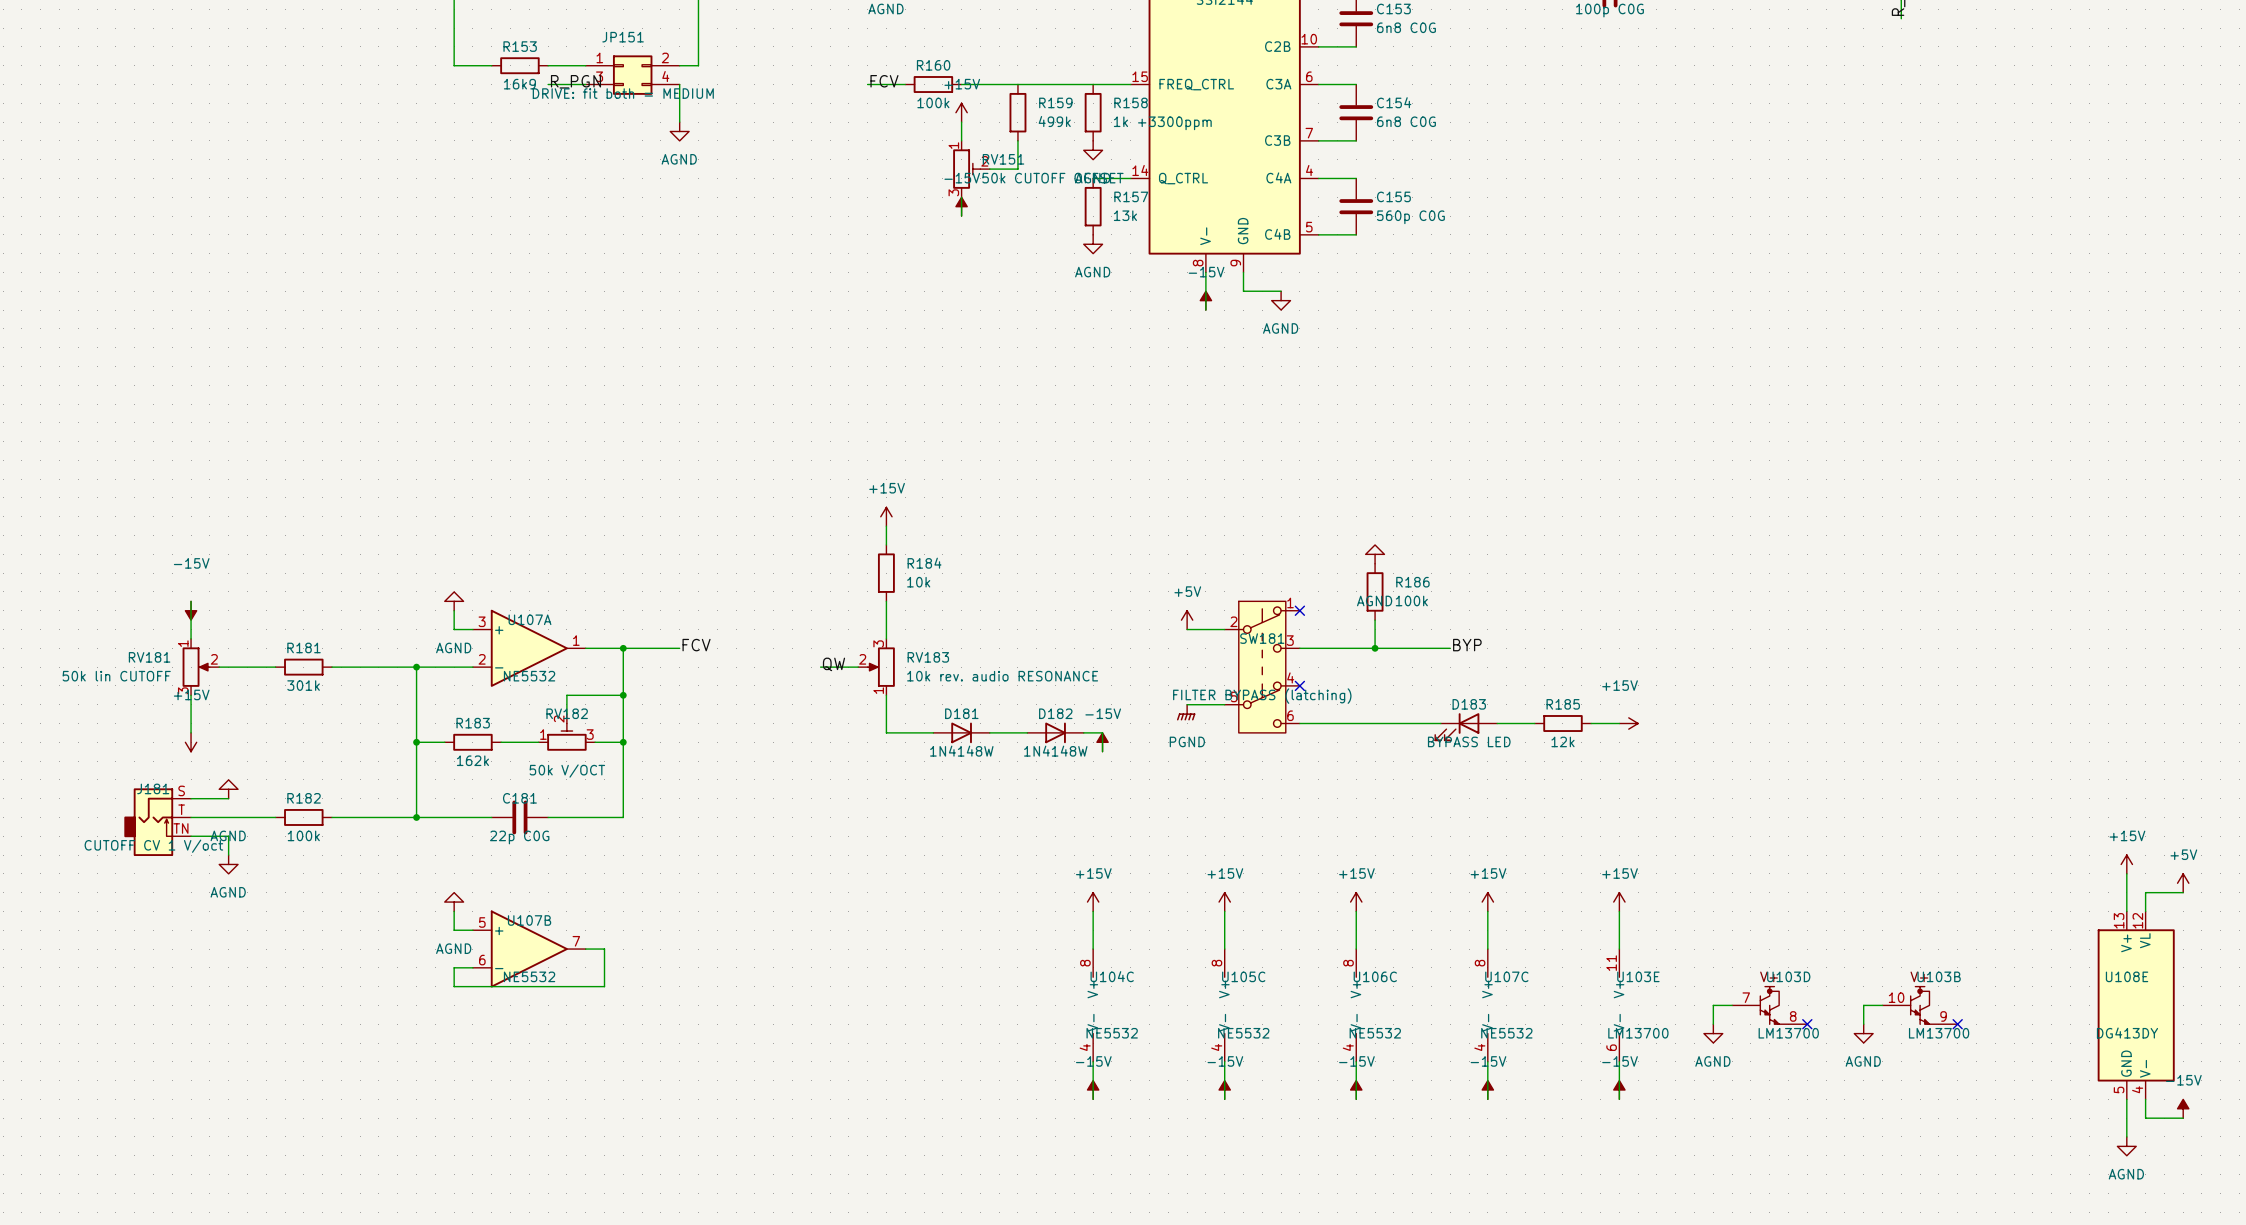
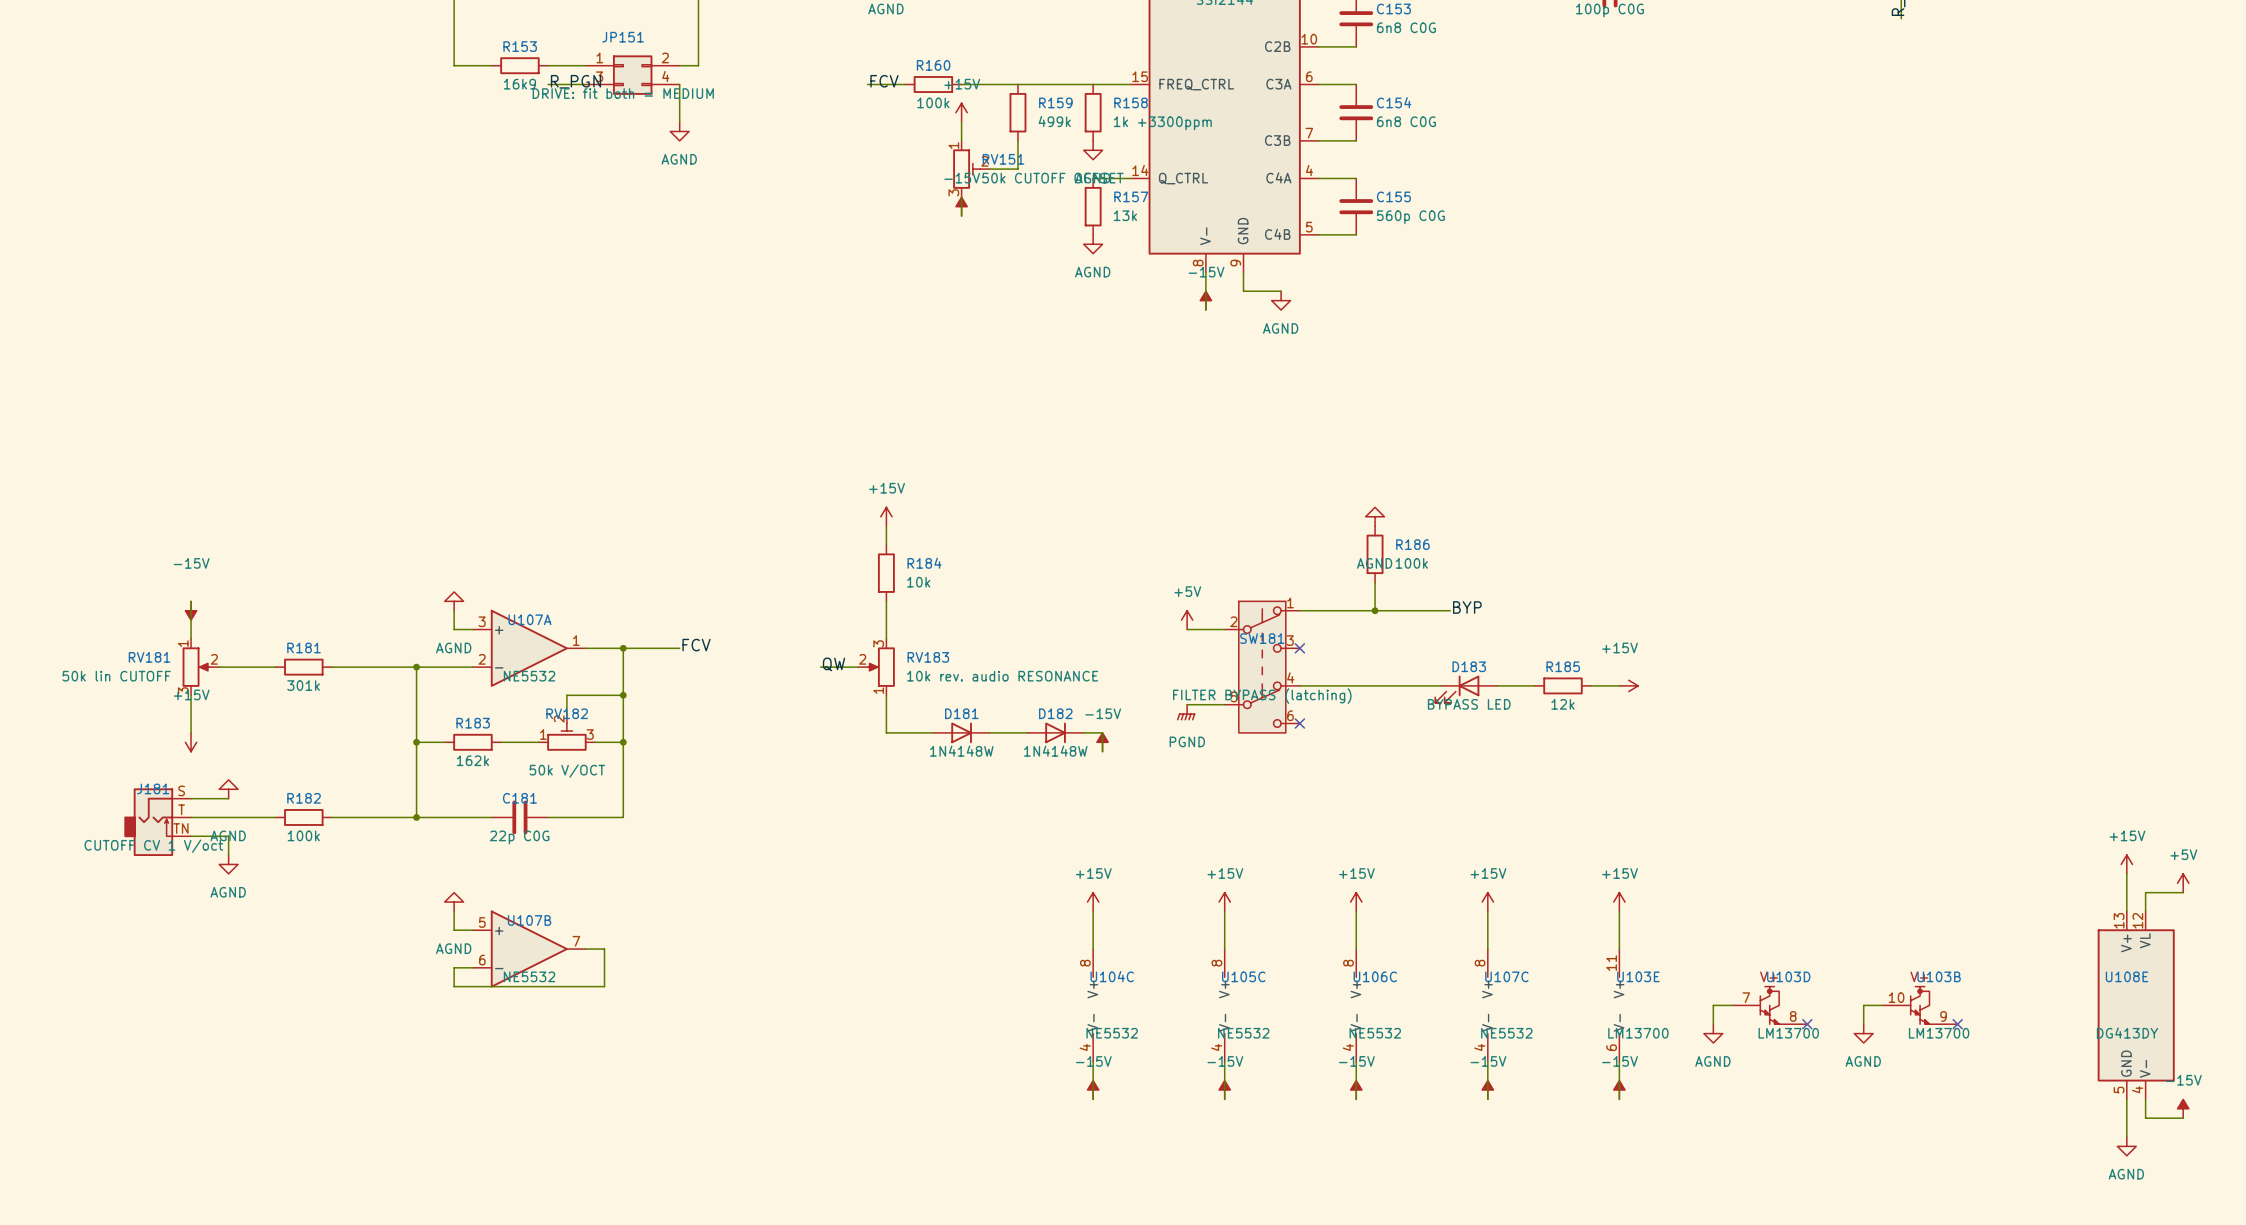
power symbol position: AGND (1375, 554) -> AGND (1375, 516)
R186 position: (1375, 591) -> (1375, 554)
no-connect mark: (1299, 610) -> none
wire: (1375, 620) (1375, 648) -> (1375, 582) (1375, 610)
label position: BYP (1467, 645) -> BYP (1467, 607)
wire: (1299, 648) (1450, 648) -> (1299, 610) (1450, 610)
no-connect mark: none -> (1299, 648)
junction position: (1375, 648) -> (1375, 610)
no-connect mark: (1299, 685) -> none
wire: (1299, 723) (1440, 723) -> (1299, 685) (1440, 685)
no-connect mark: none -> (1299, 723)
wire: (1497, 723) (1534, 723) -> (1497, 685) (1534, 685)
R185 position: (1562, 723) -> (1562, 685)
wire: (1591, 723) (1619, 723) -> (1591, 685) (1619, 685)
power symbol position: +15V (1628, 723) -> +15V (1628, 685)
D183 position: (1466, 726) -> (1466, 689)

